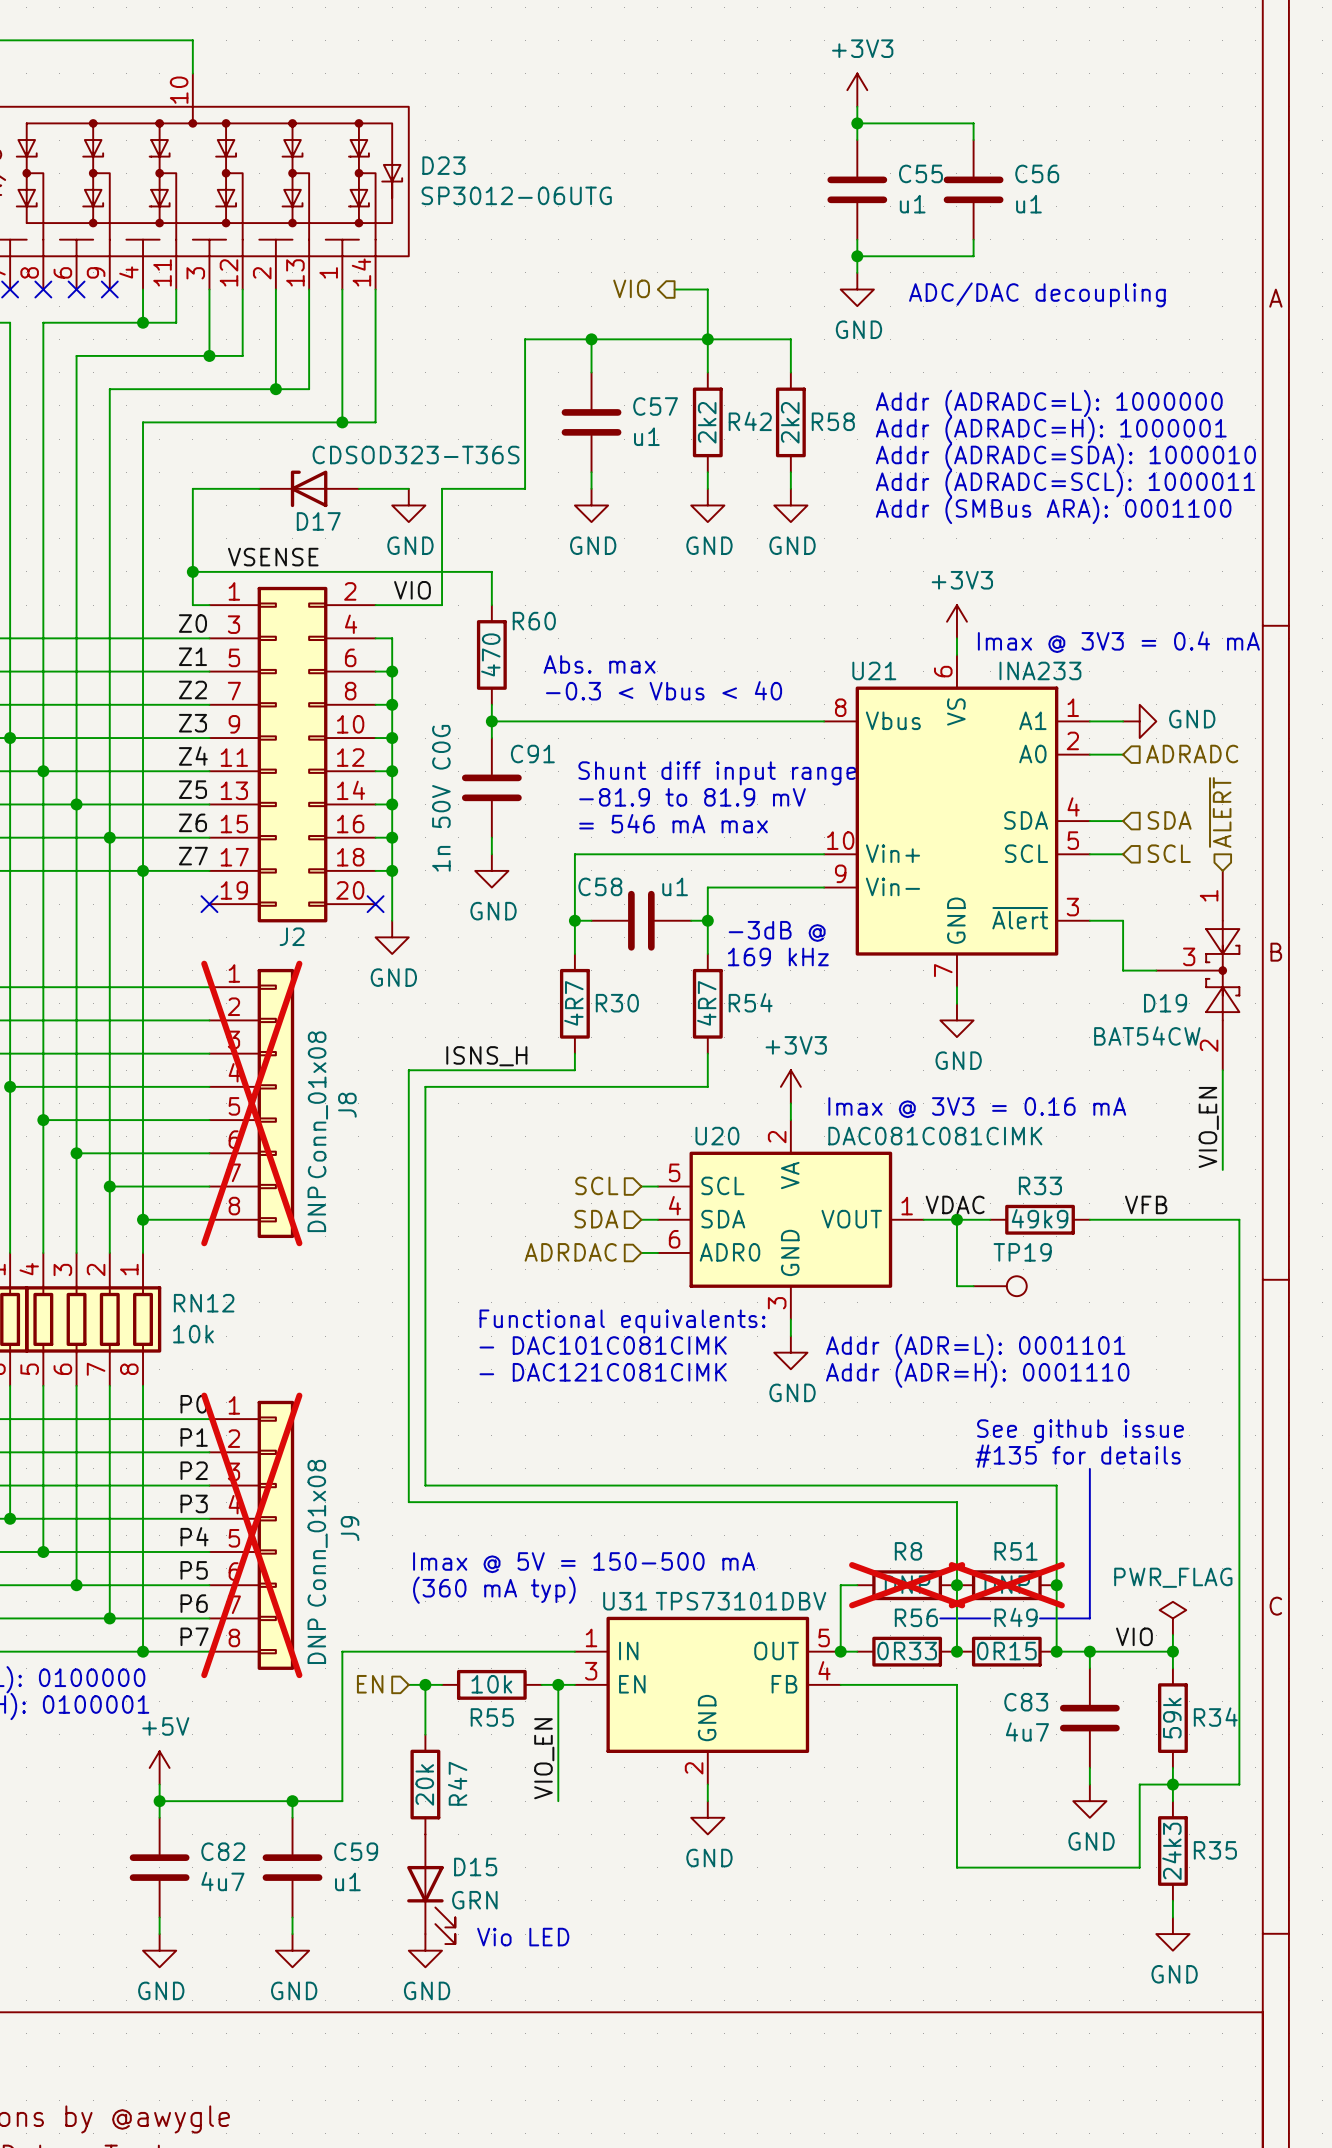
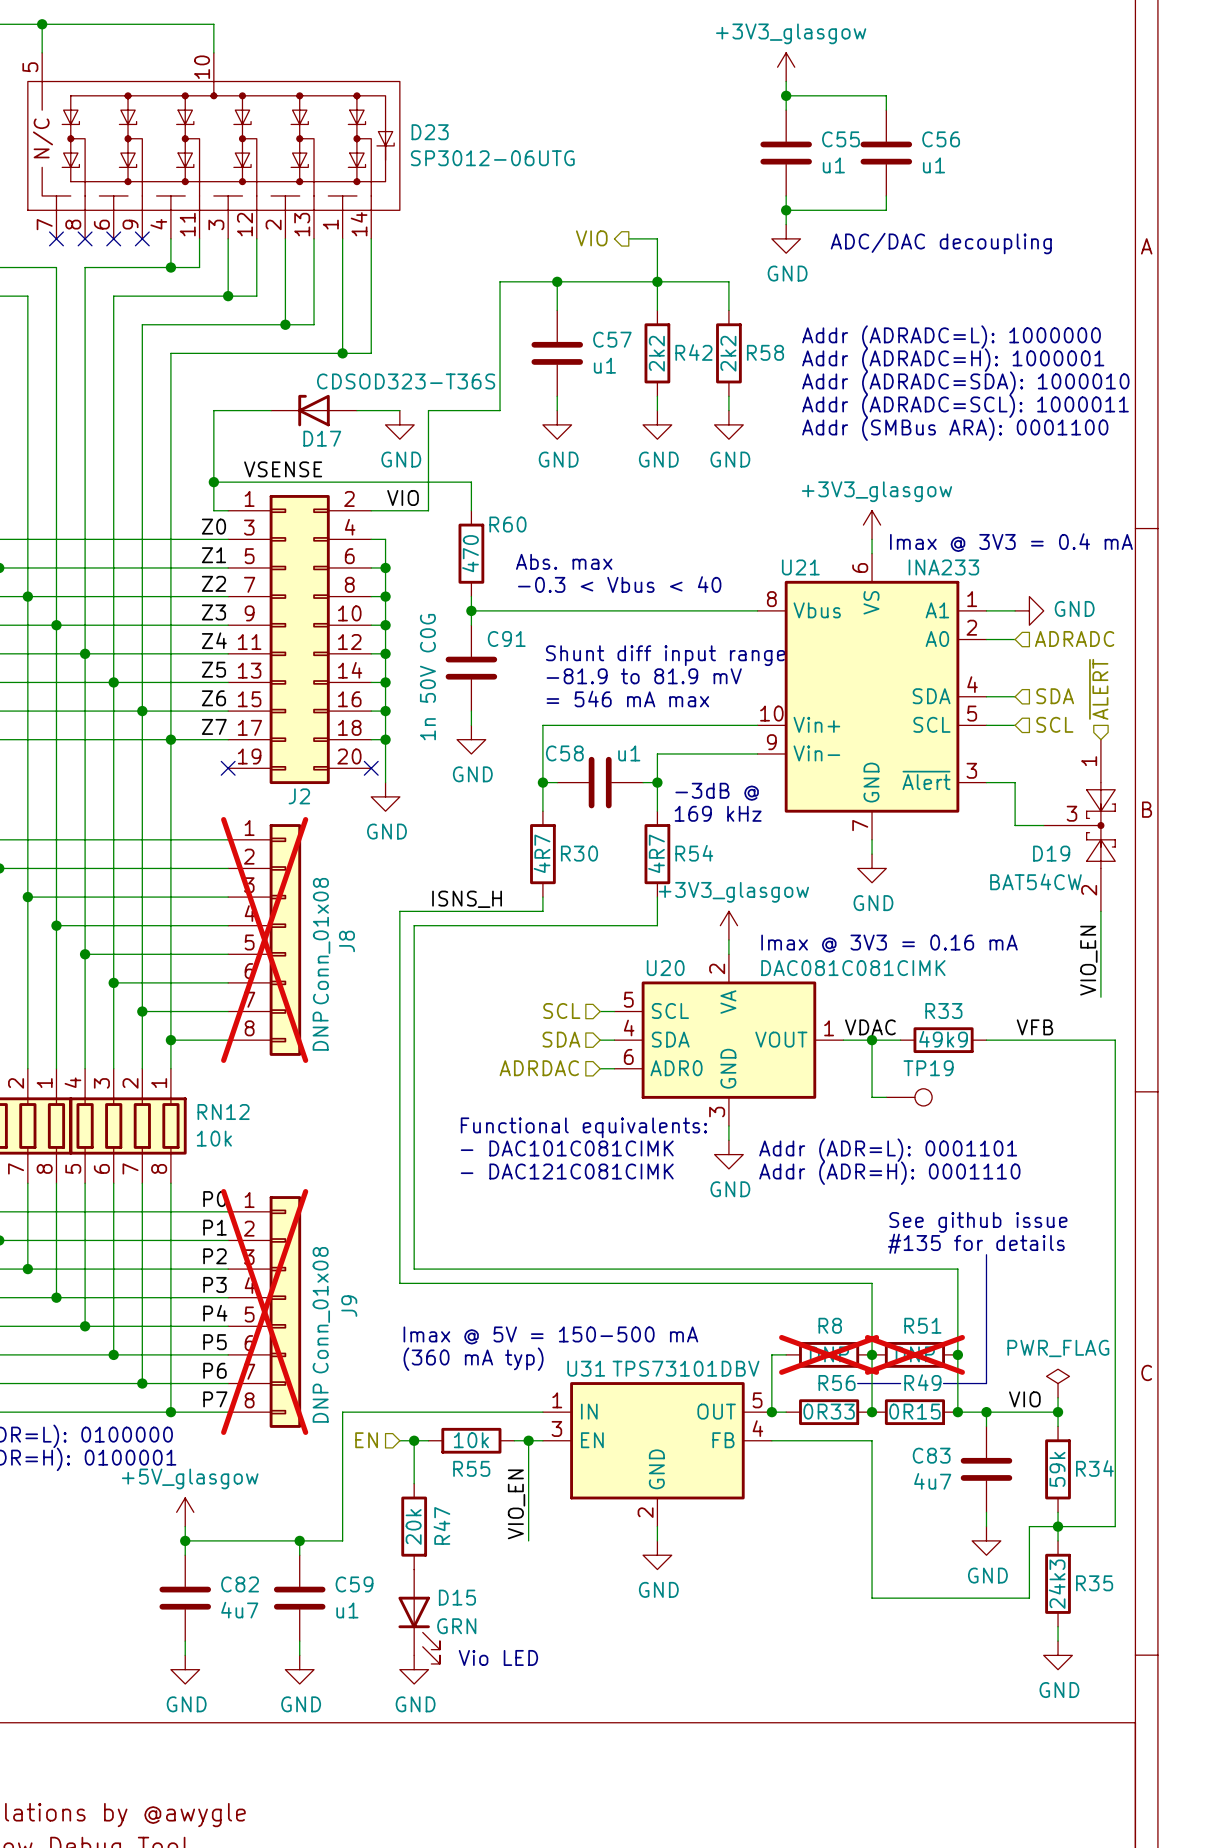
power symbol: +3V3 (857, 90) -> +3V3_glasgow (786, 67)
power symbol: +3V3 (956, 621) -> +3V3_glasgow (872, 525)
power symbol: +3V3 (790, 1086) -> +3V3_glasgow (728, 925)
power symbol: +5V (159, 1767) -> +5V_glasgow (185, 1512)

